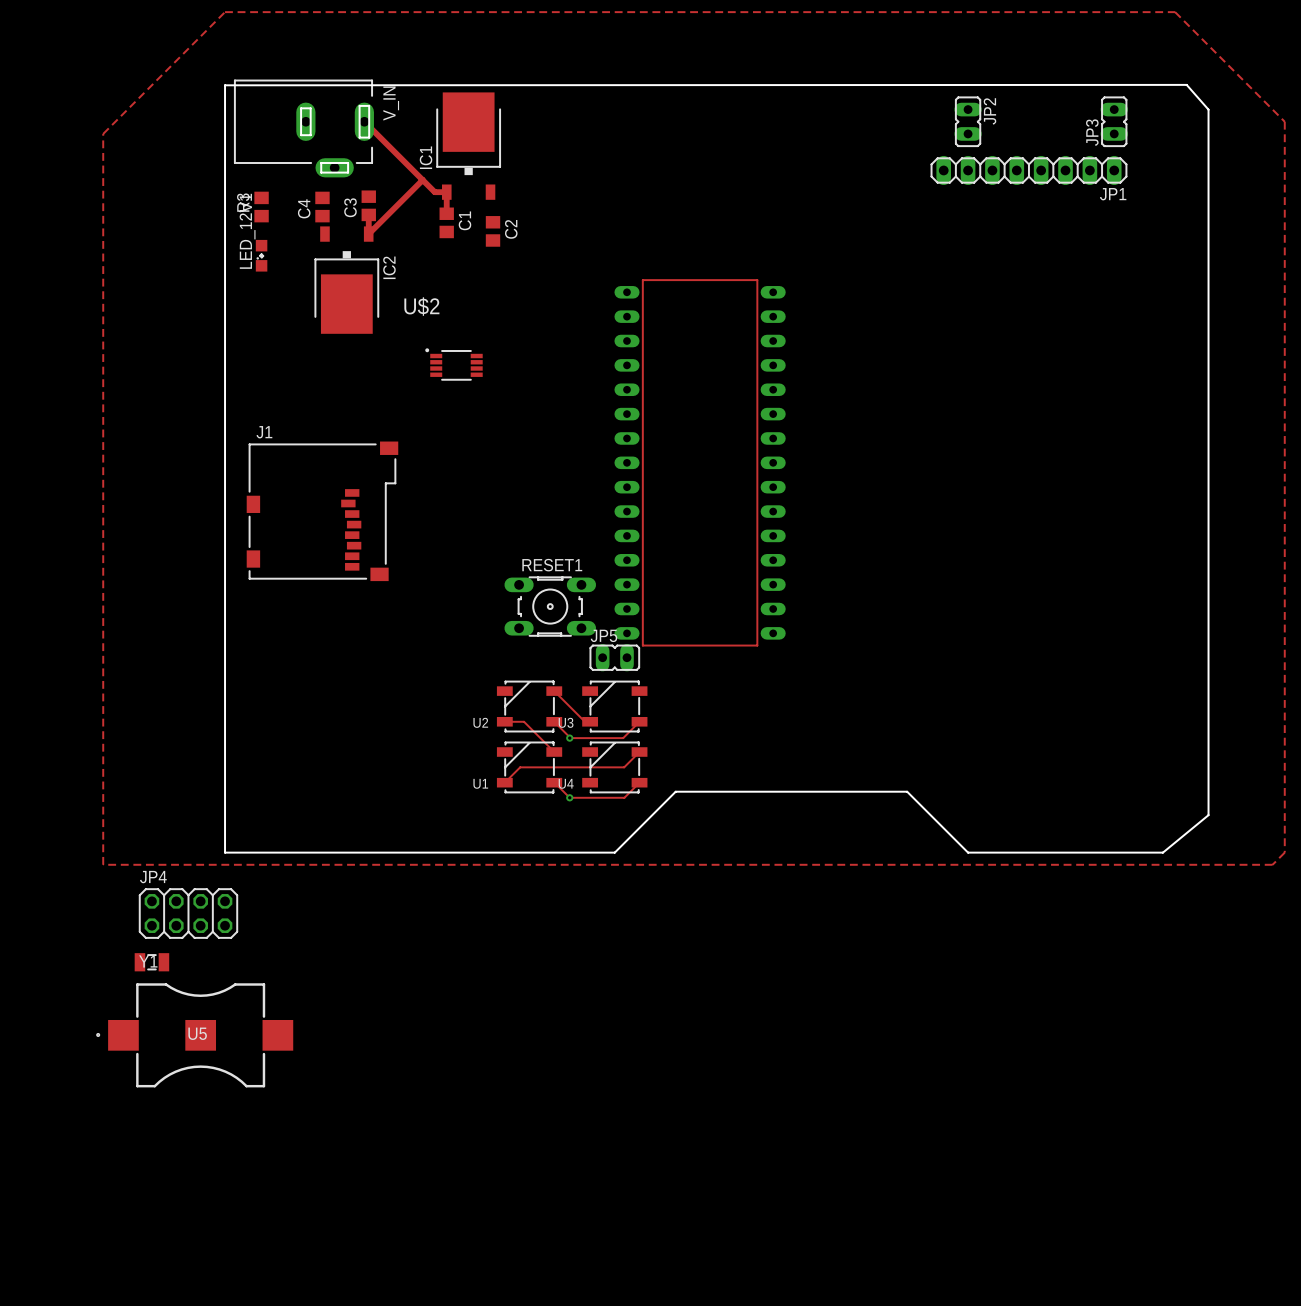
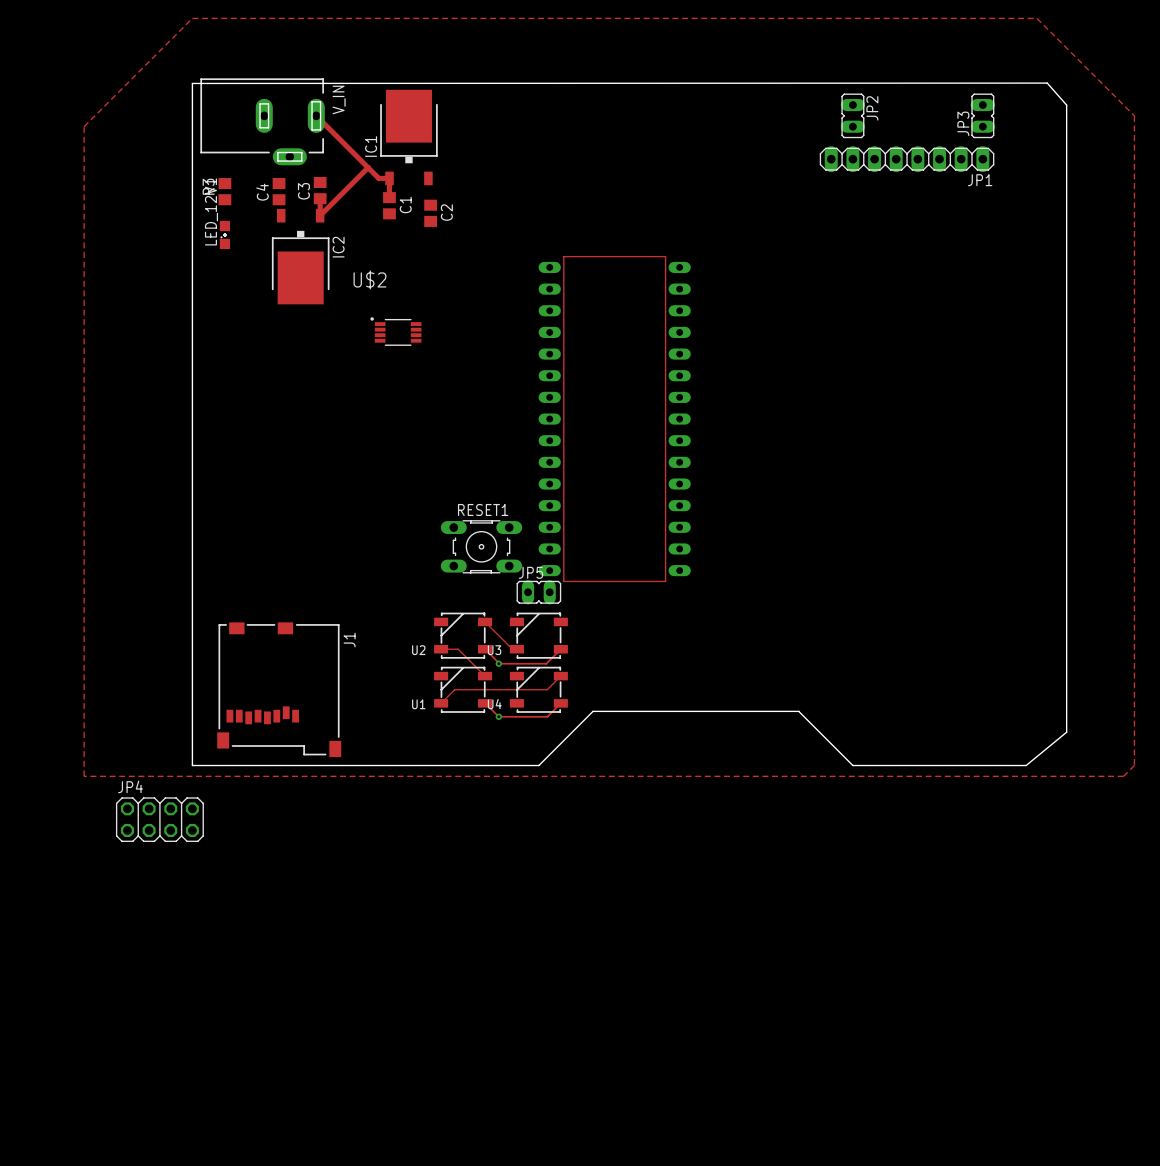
J1 rotation: 0° (322, 511) -> 90° clockwise (279, 689)
J1 position: (322, 511) -> (279, 689)
Y1: (151, 962) -> none
U5: (194, 1035) -> none

